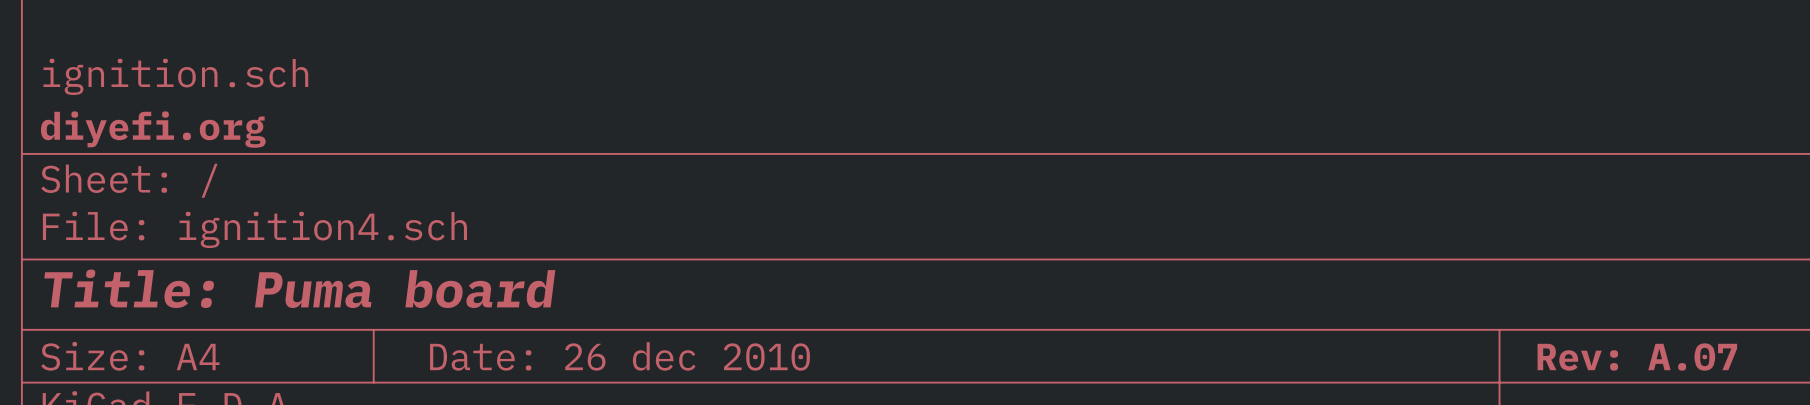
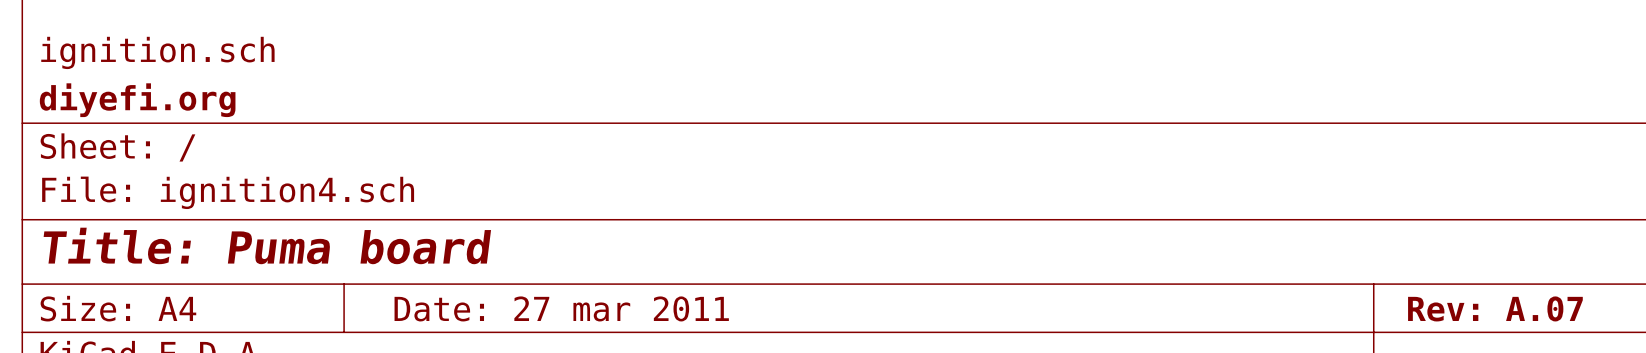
title block: Date: 26 dec 2010 (620, 356) -> Date: 27 mar 2011 (561, 308)

